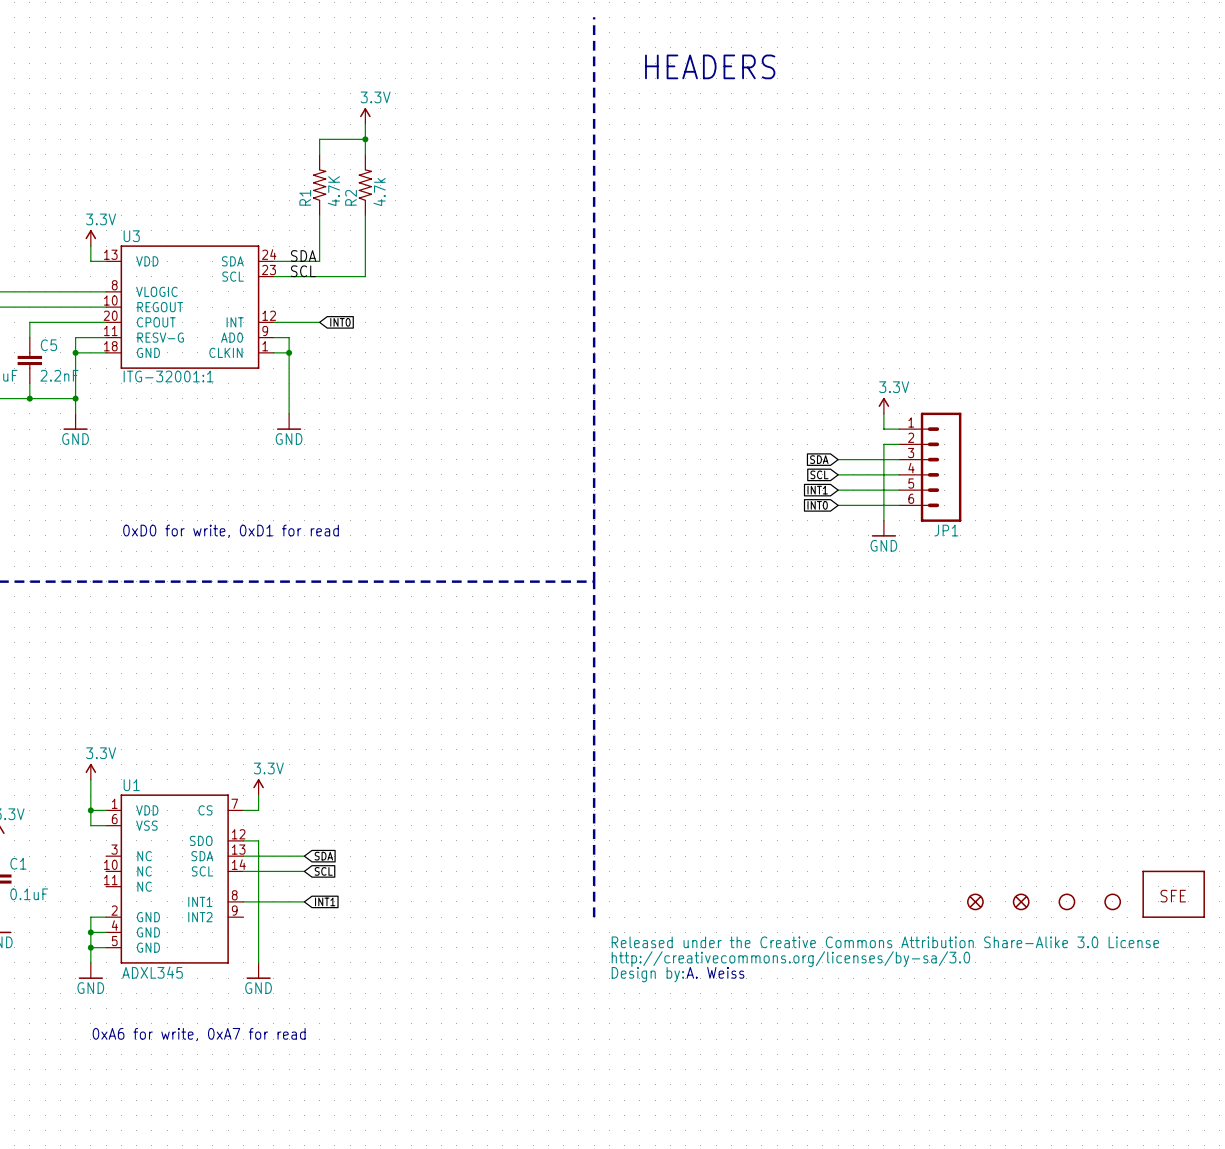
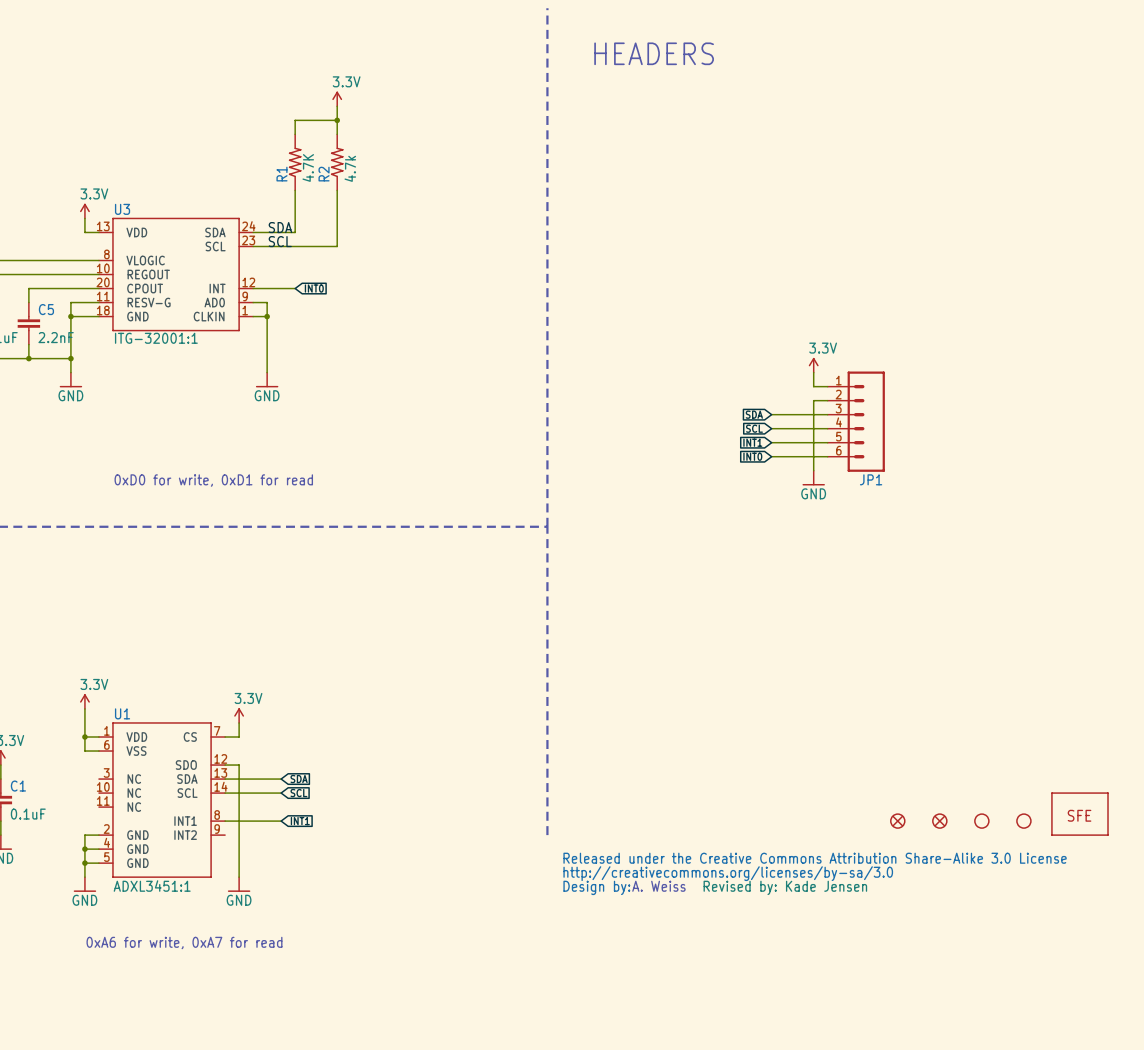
U1 value: ADXL345 (152, 972) -> ADXL3451:1 (152, 886)
text: none -> Revised by: Kade Jensen (785, 887)

